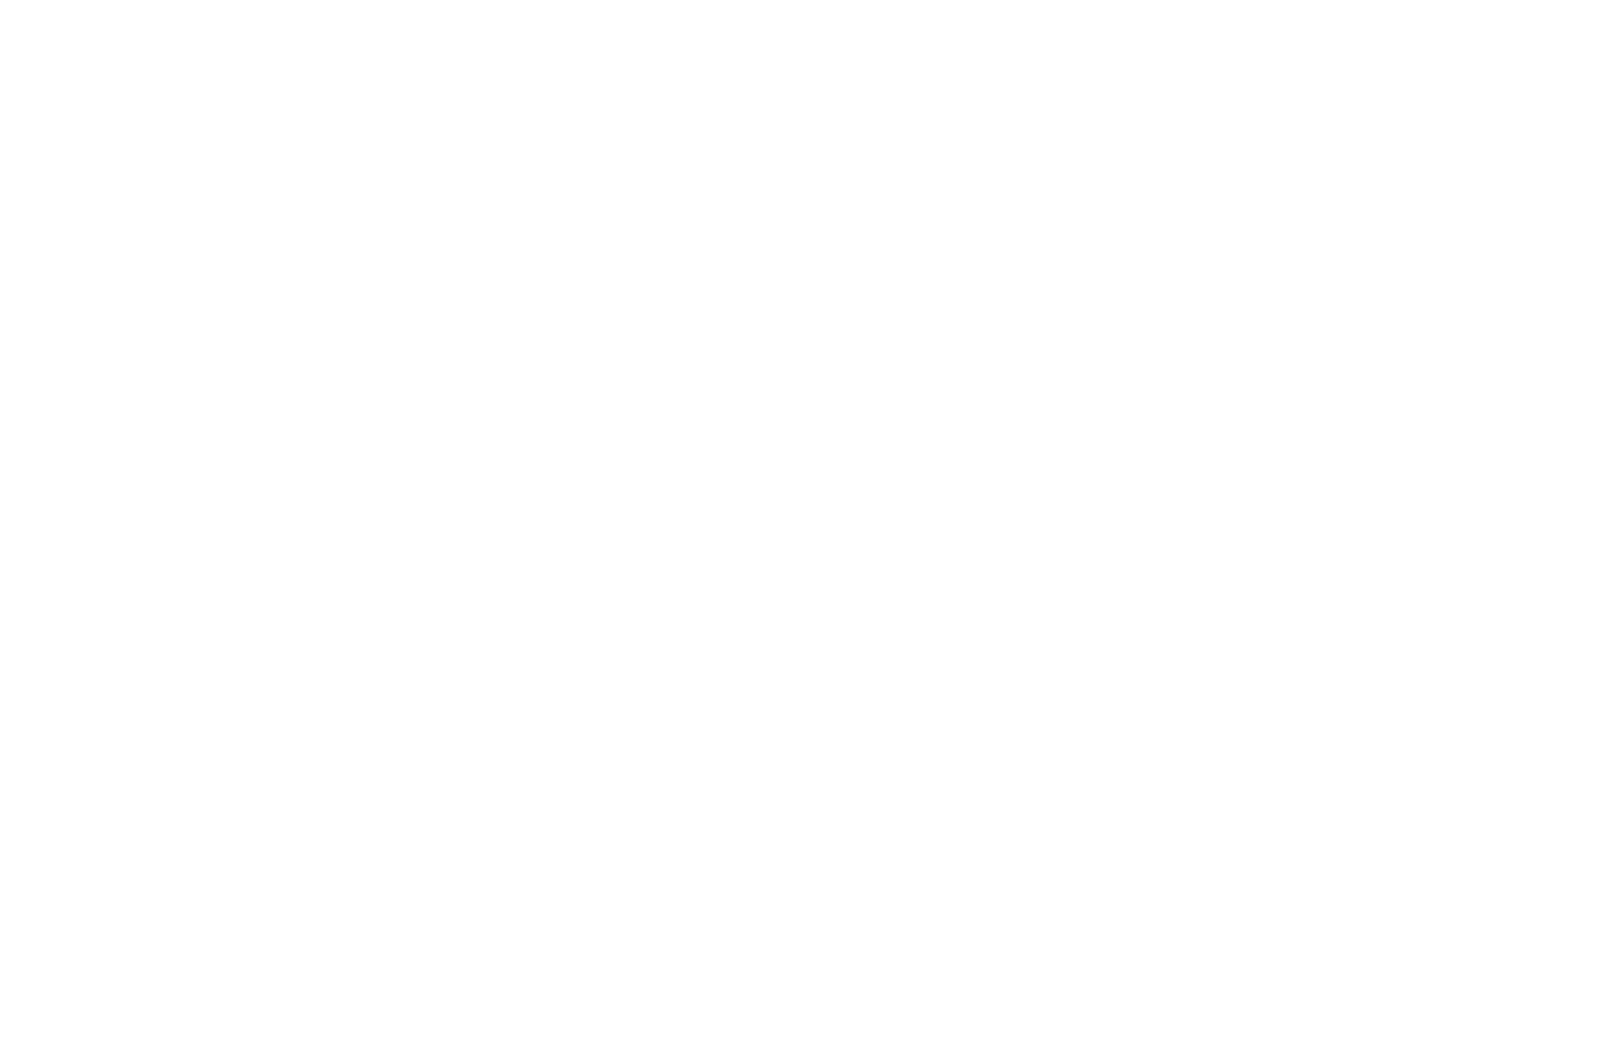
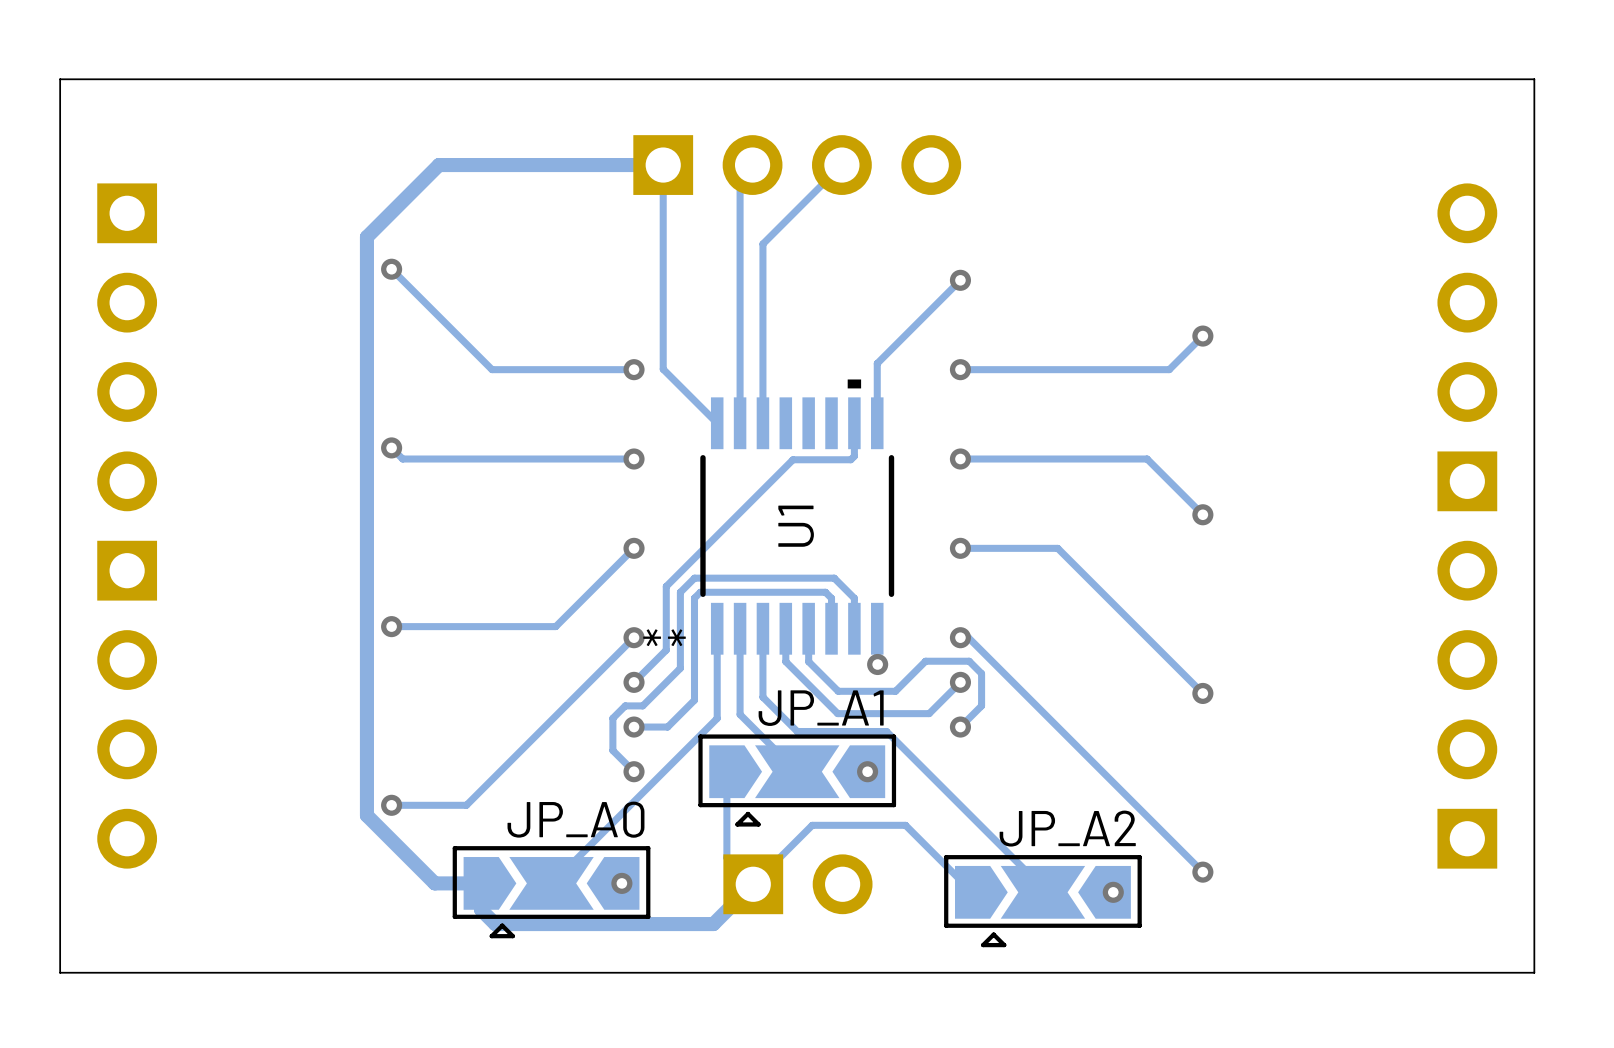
board edge: none -> (1534, 79) (60, 79) (60, 972) (1534, 972) (1534, 79)
track: none -> (752, 165) (740, 177) (740, 423)
part: none -> (797, 165)
track: none -> (841, 165) (762, 244) (762, 423)
track: none -> (391, 269) (492, 369) (634, 369)
via: none -> (391, 269)
track: none -> (960, 280) (877, 363) (877, 423)
via: none -> (960, 280)
track: none -> (1202, 336) (1169, 369) (960, 369)
via: none -> (1202, 336)
part: none -> (127, 347)
part: none -> (1467, 347)
via: none -> (634, 369)
via: none -> (960, 369)
track: none -> (717, 423) (663, 369) (663, 165) (438, 165) (366, 237) (366, 815) (434, 883) (481, 883) (481, 909) (495, 924) (713, 924) (753, 884)
track: none -> (854, 423) (854, 456) (850, 459) (792, 459) (666, 586) (666, 650) (634, 682)
track: none -> (391, 447) (402, 459) (634, 459)
via: none -> (391, 447)
via: none -> (634, 459)
track: none -> (960, 459) (1147, 459) (1202, 514)
via: none -> (960, 459)
via: none -> (1202, 514)
U1: none -> (797, 517)
track: none -> (634, 548) (555, 626) (391, 626)
via: none -> (634, 548)
track: none -> (960, 548) (1057, 548) (1202, 693)
via: none -> (960, 548)
via: none -> (391, 626)
track: none -> (717, 628) (717, 718) (552, 883)
track: none -> (740, 628) (740, 714) (797, 771)
track: none -> (762, 628) (762, 697) (797, 731) (886, 731) (1042, 887) (1042, 892)
track: none -> (785, 628) (785, 661) (837, 713) (929, 713) (960, 682)
track: none -> (808, 628) (808, 661) (838, 691) (895, 691) (925, 661) (969, 661) (981, 673) (981, 705) (960, 727)
track: none -> (831, 628) (831, 598) (825, 592) (700, 592) (694, 598) (694, 700) (667, 727) (634, 727)
track: none -> (854, 628) (854, 598) (834, 578) (694, 578) (680, 592) (680, 668) (642, 705) (625, 705) (612, 718) (612, 750) (634, 771)
track: none -> (634, 637) (466, 805) (391, 805)
via: none -> (634, 637)
track: none -> (960, 637) (968, 637) (1202, 872)
via: none -> (960, 637)
via: none -> (877, 664)
via: none -> (634, 682)
via: none -> (960, 682)
via: none -> (1202, 693)
part: none -> (127, 704)
part: none -> (1467, 704)
via: none -> (634, 727)
via: none -> (960, 727)
via: none -> (634, 771)
track: none -> (726, 771) (726, 857) (753, 884)
via: none -> (867, 771)
JP_A1: none -> (797, 780)
via: none -> (391, 805)
via: none -> (1202, 872)
via: none -> (621, 883)
track: none -> (753, 884) (812, 825) (905, 825) (972, 892)
part: none -> (797, 884)
JP_A0: none -> (551, 892)
via: none -> (1113, 892)
JP_A2: none -> (1042, 901)

